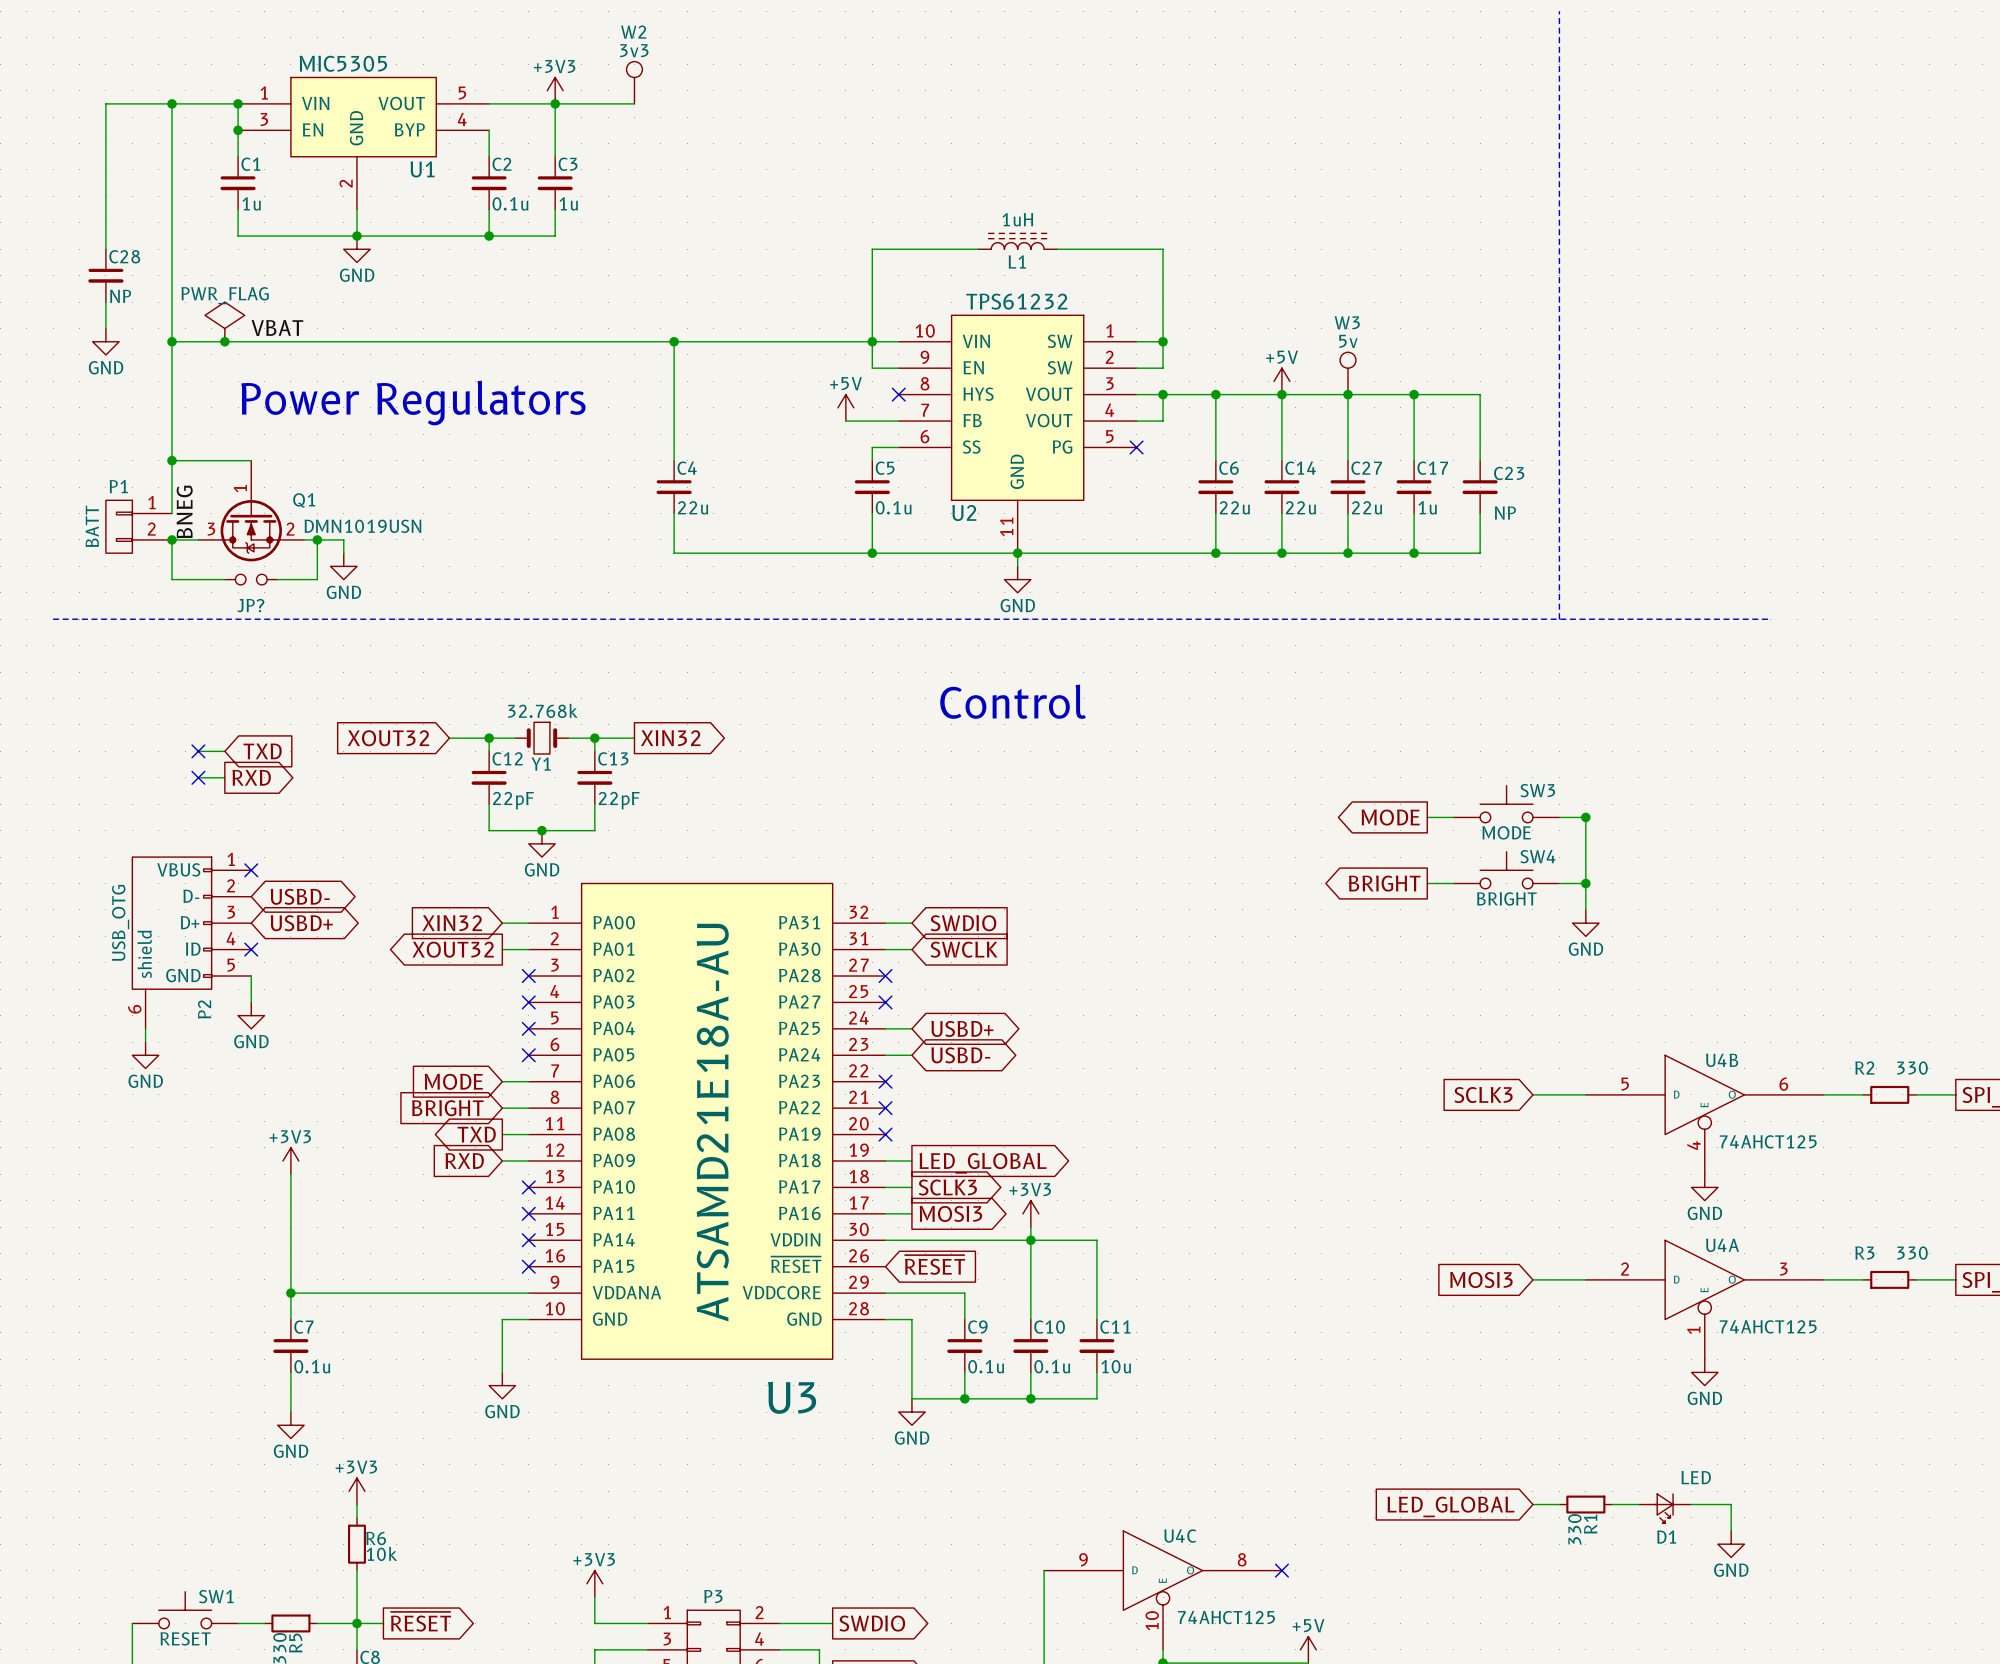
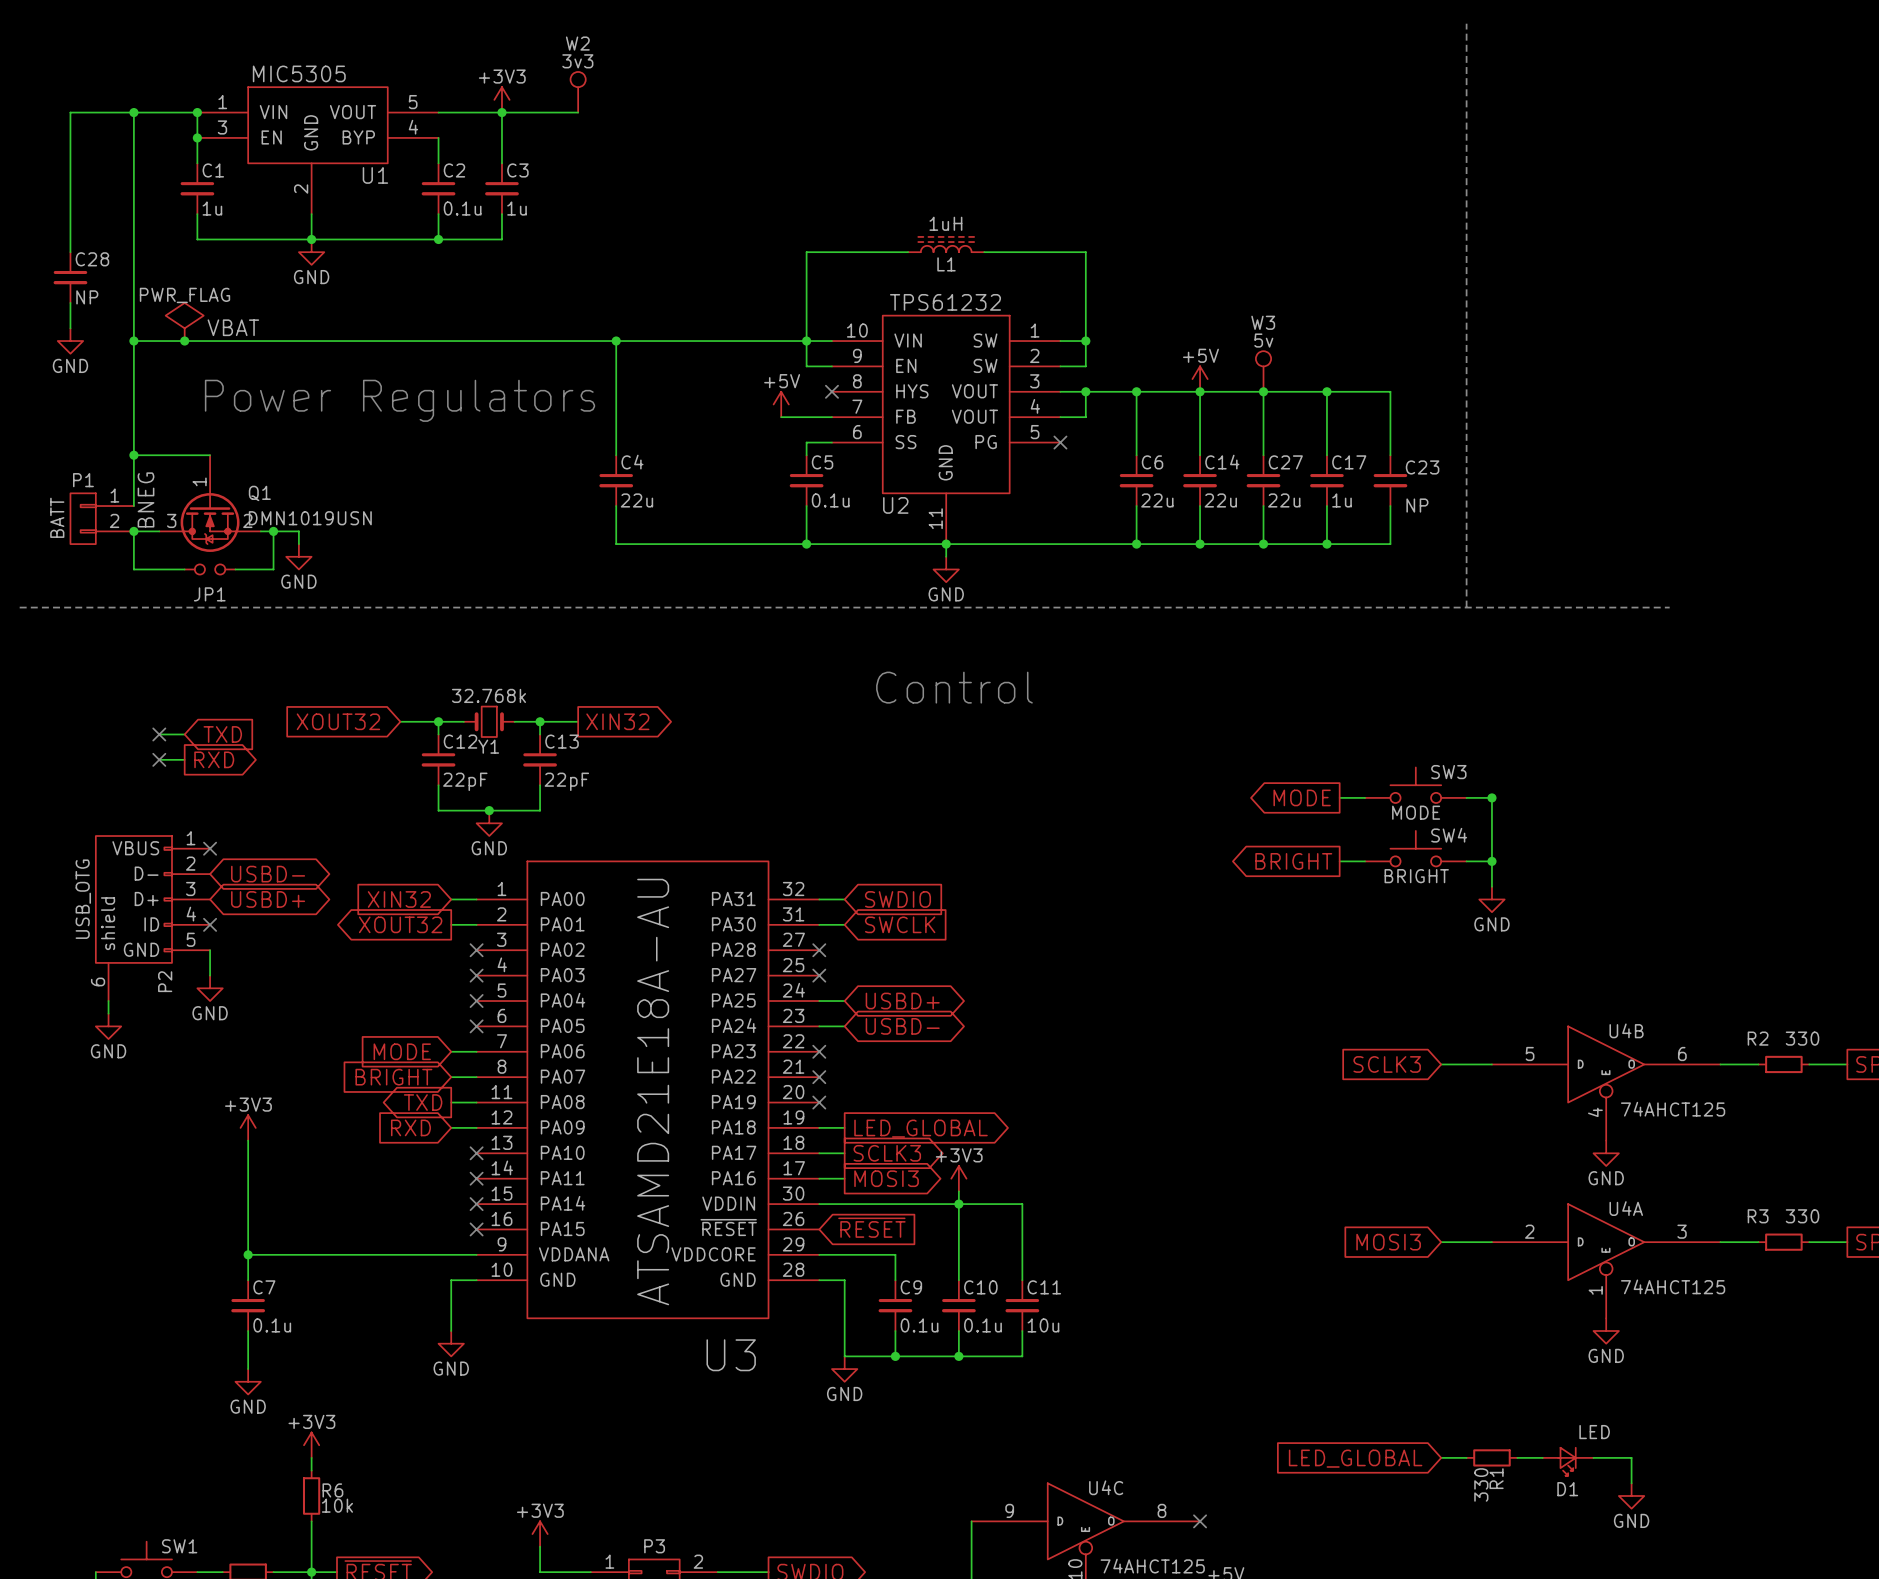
JP? name: JP? (250, 605) -> JP1 (209, 594)

